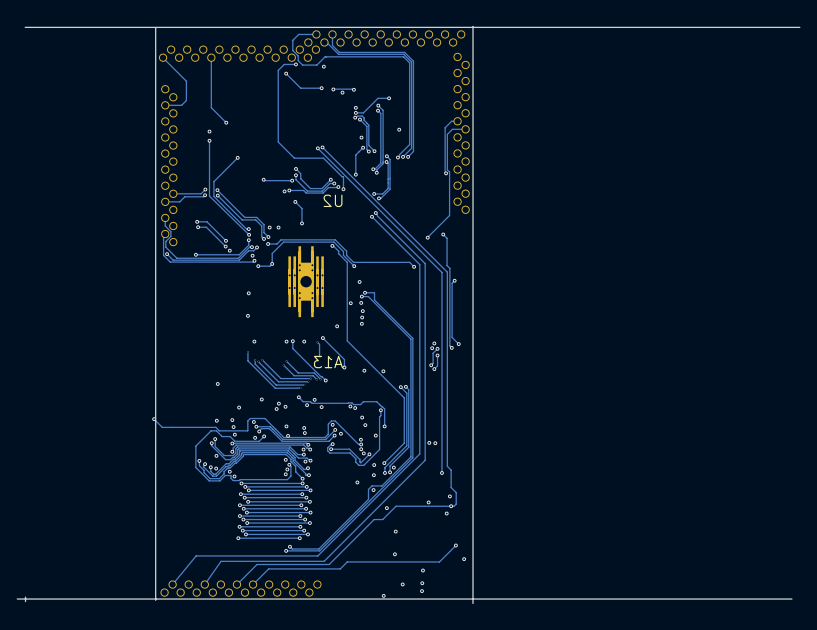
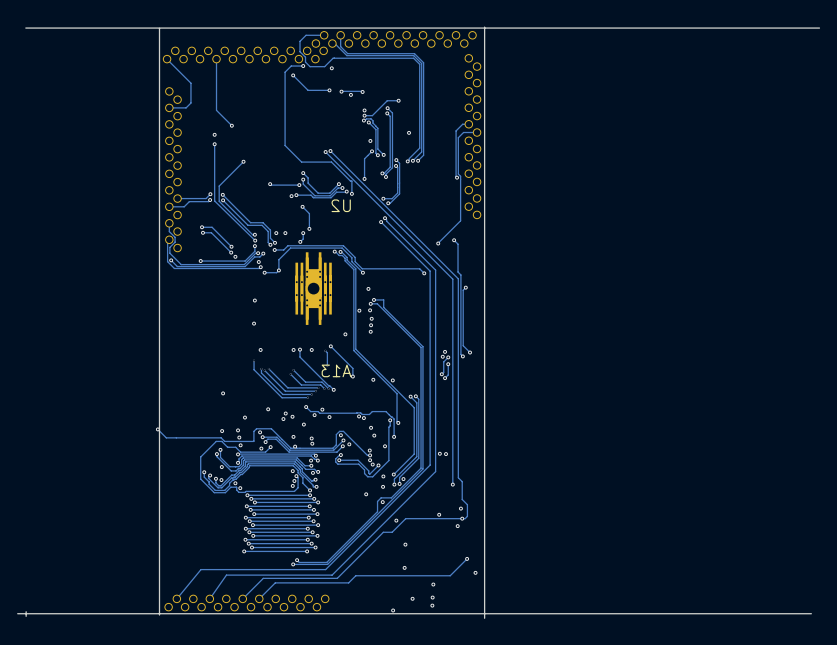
track: none -> (303, 233) (303, 238) (300, 241)
via: none -> (303, 233)
via: none -> (300, 241)
track: none -> (334, 251) (342, 255) (353, 269) (353, 350) (397, 393) (398, 422)
via: none -> (334, 251)
via: none -> (398, 422)
via: none -> (303, 424)

